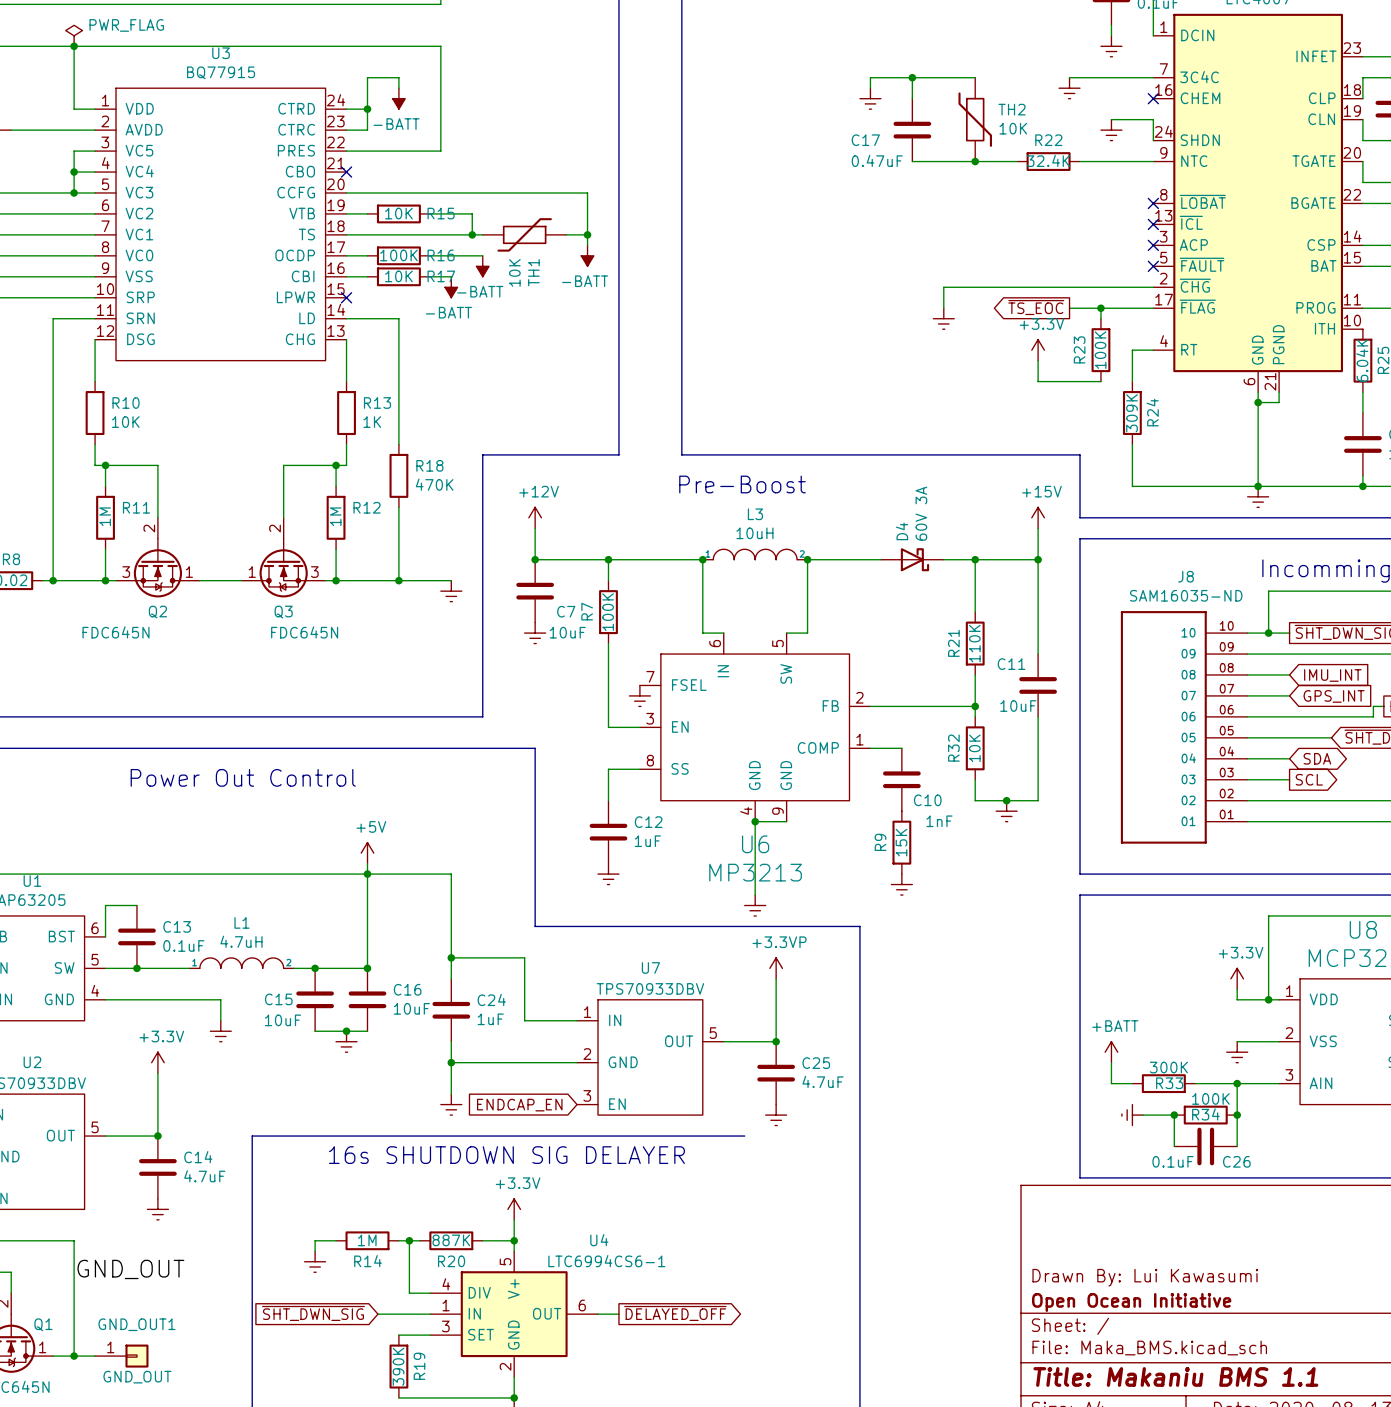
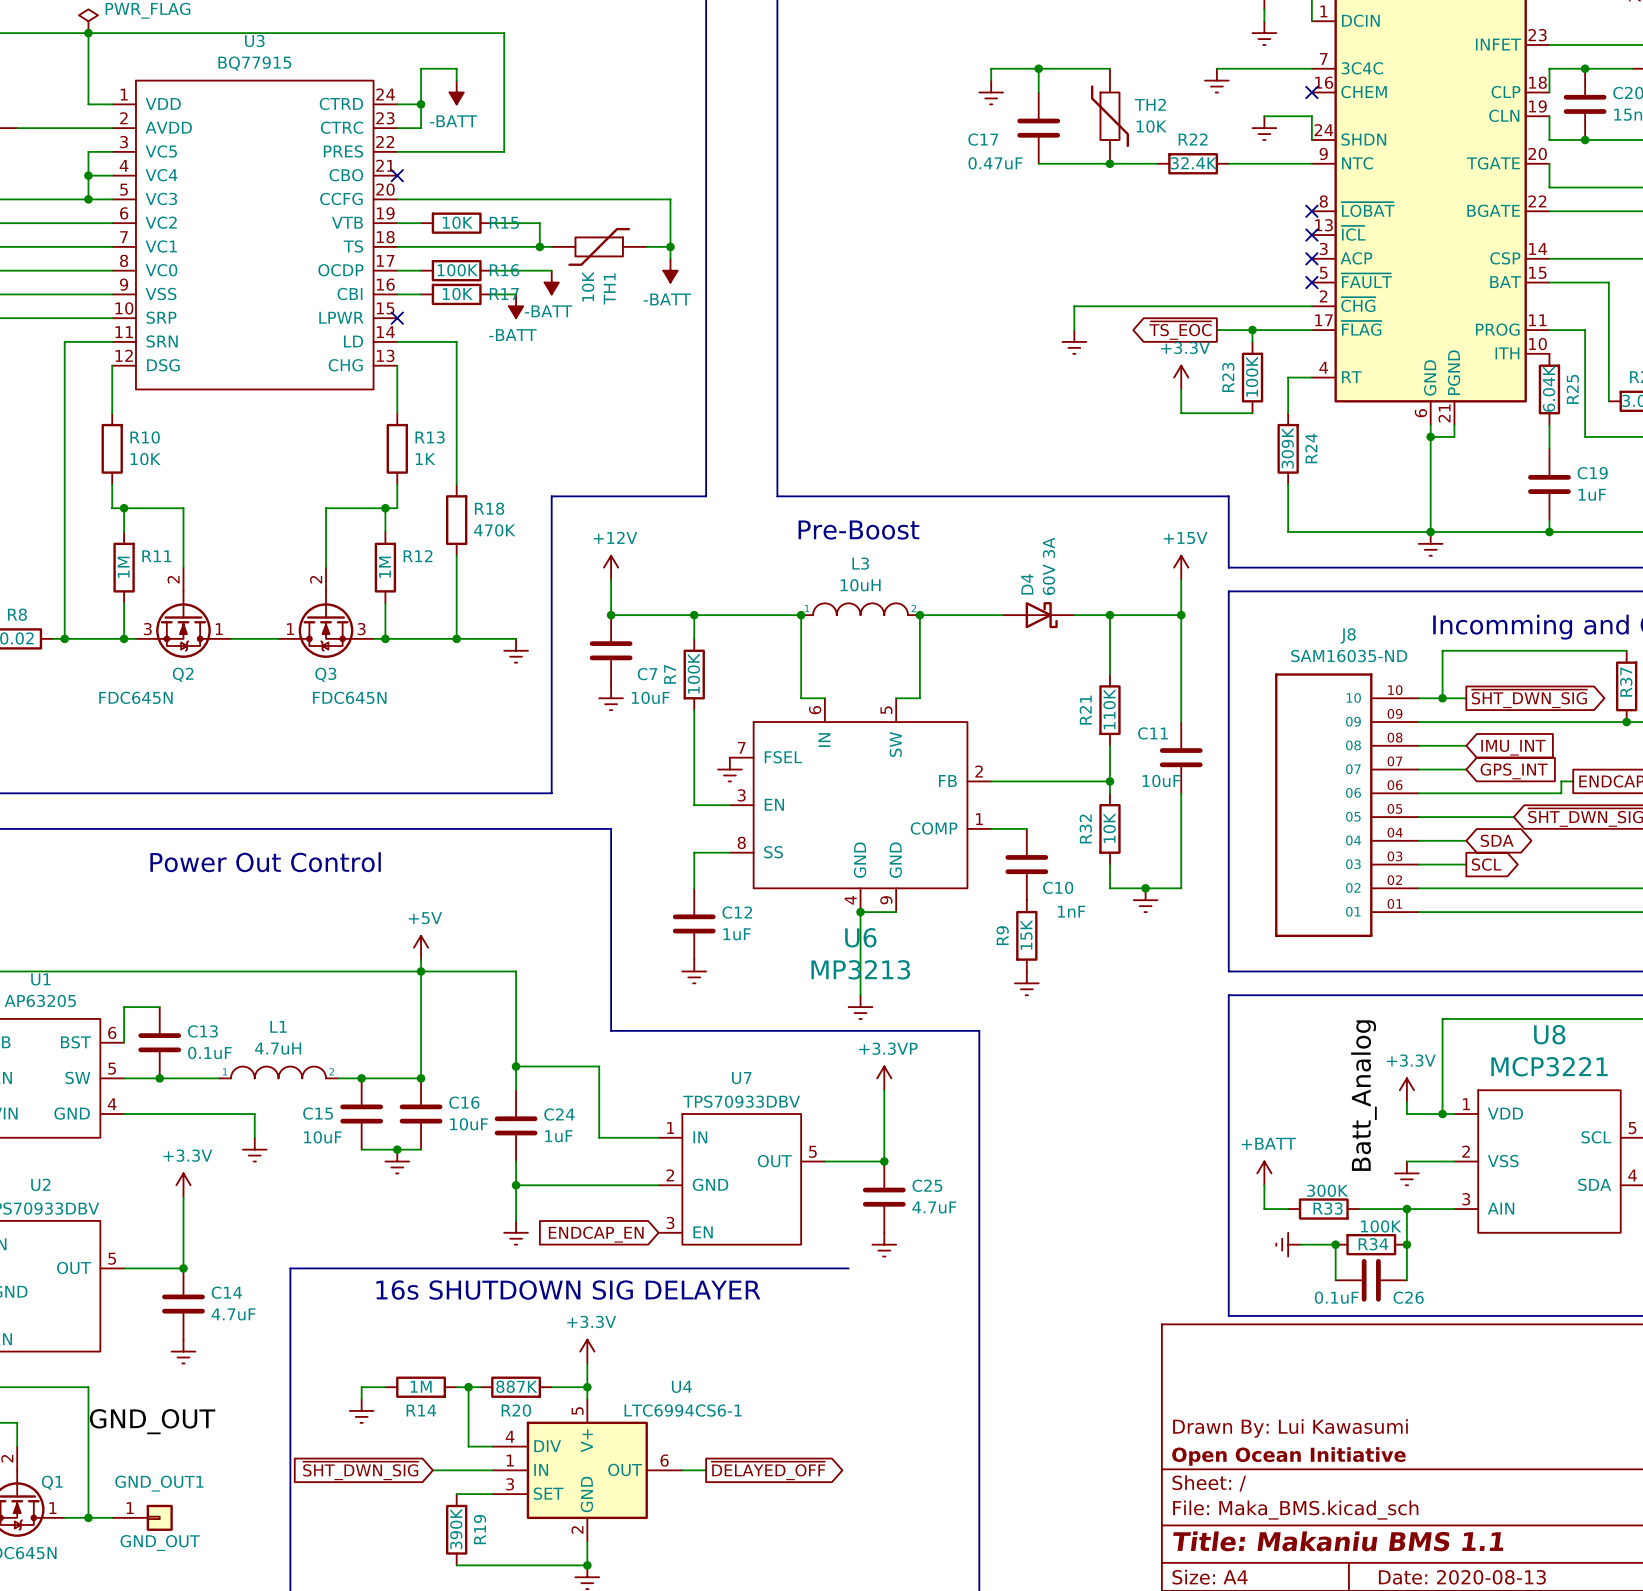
label: none -> Batt_Analog (1363, 1095)

